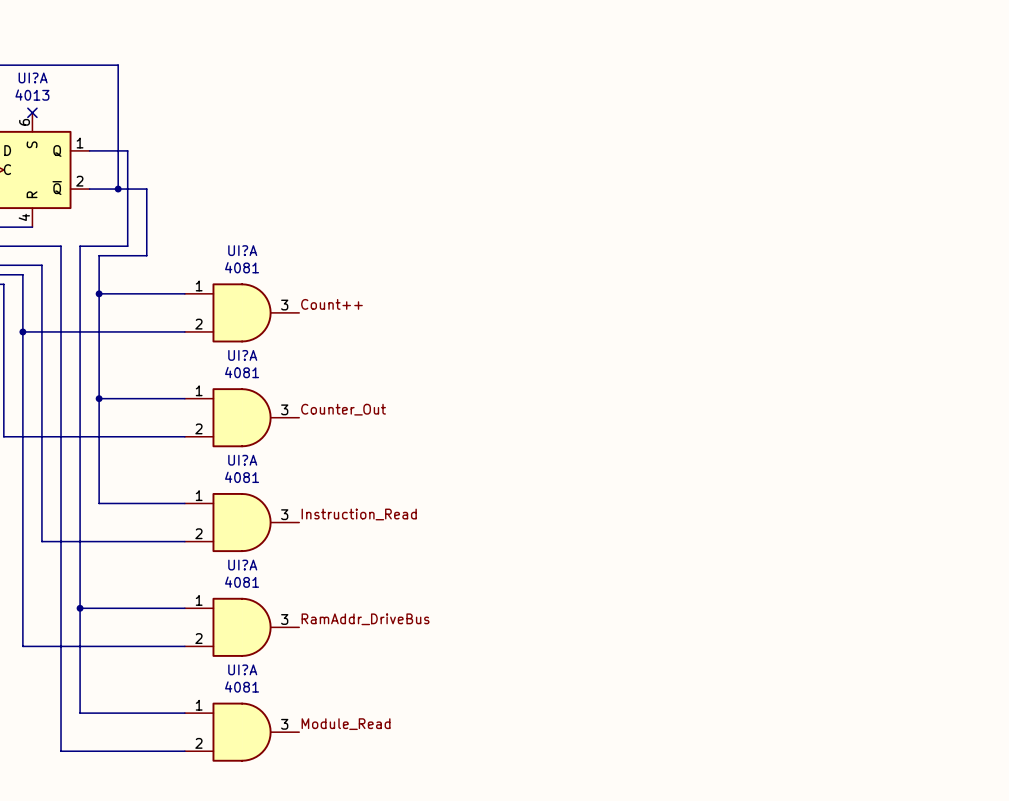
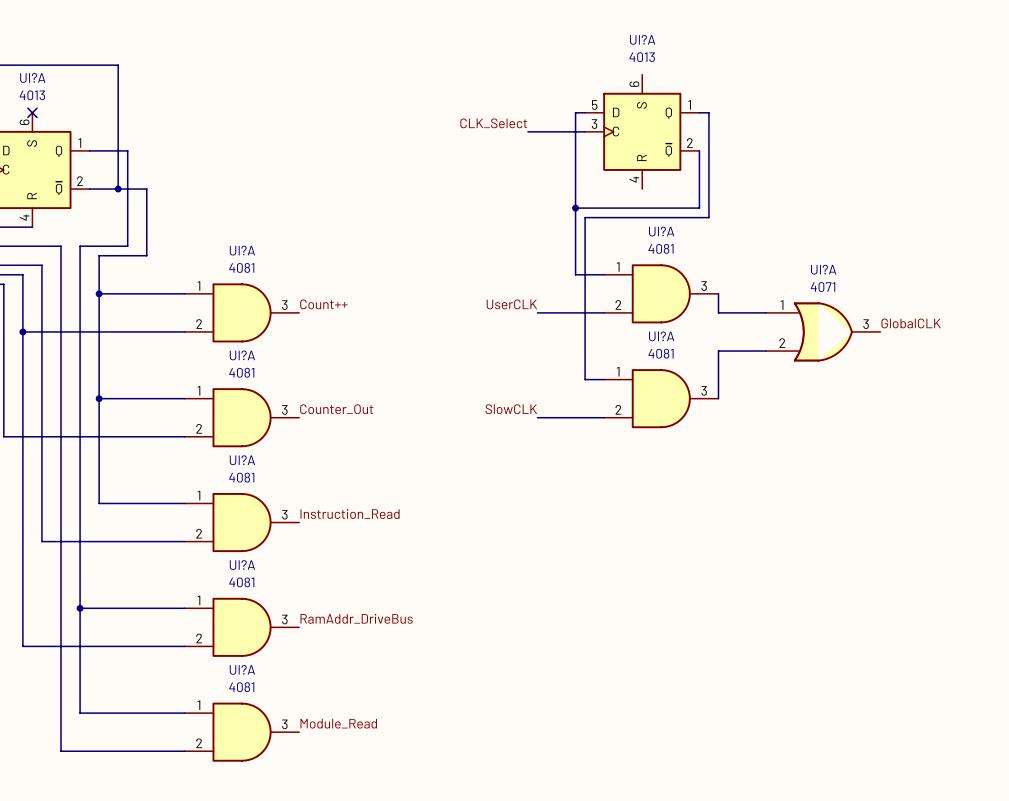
wire: none -> (585, 112) (575, 112) (575, 274) (604, 274)
wire: none -> (699, 112) (708, 112) (708, 217) (585, 217) (585, 379) (604, 379)
label: none -> CLK_Select (493, 123)
wire: none -> (527, 131) (585, 131)
UI?A: none -> 4013 (642, 131)
wire: none -> (699, 150) (699, 208) (575, 208)
junction: none -> (575, 208)
UI?A: none -> 4081 (661, 293)
wire: none -> (718, 293) (718, 312) (766, 312)
label: none -> UserCLK (511, 304)
wire: none -> (537, 312) (604, 312)
label: none -> GlobalCLK (911, 323)
UI?A: none -> 4071 (823, 331)
wire: none -> (766, 351) (718, 351) (718, 398)
UI?A: none -> 4081 (661, 398)
label: none -> SlowCLK (511, 409)
wire: none -> (537, 417) (604, 417)

